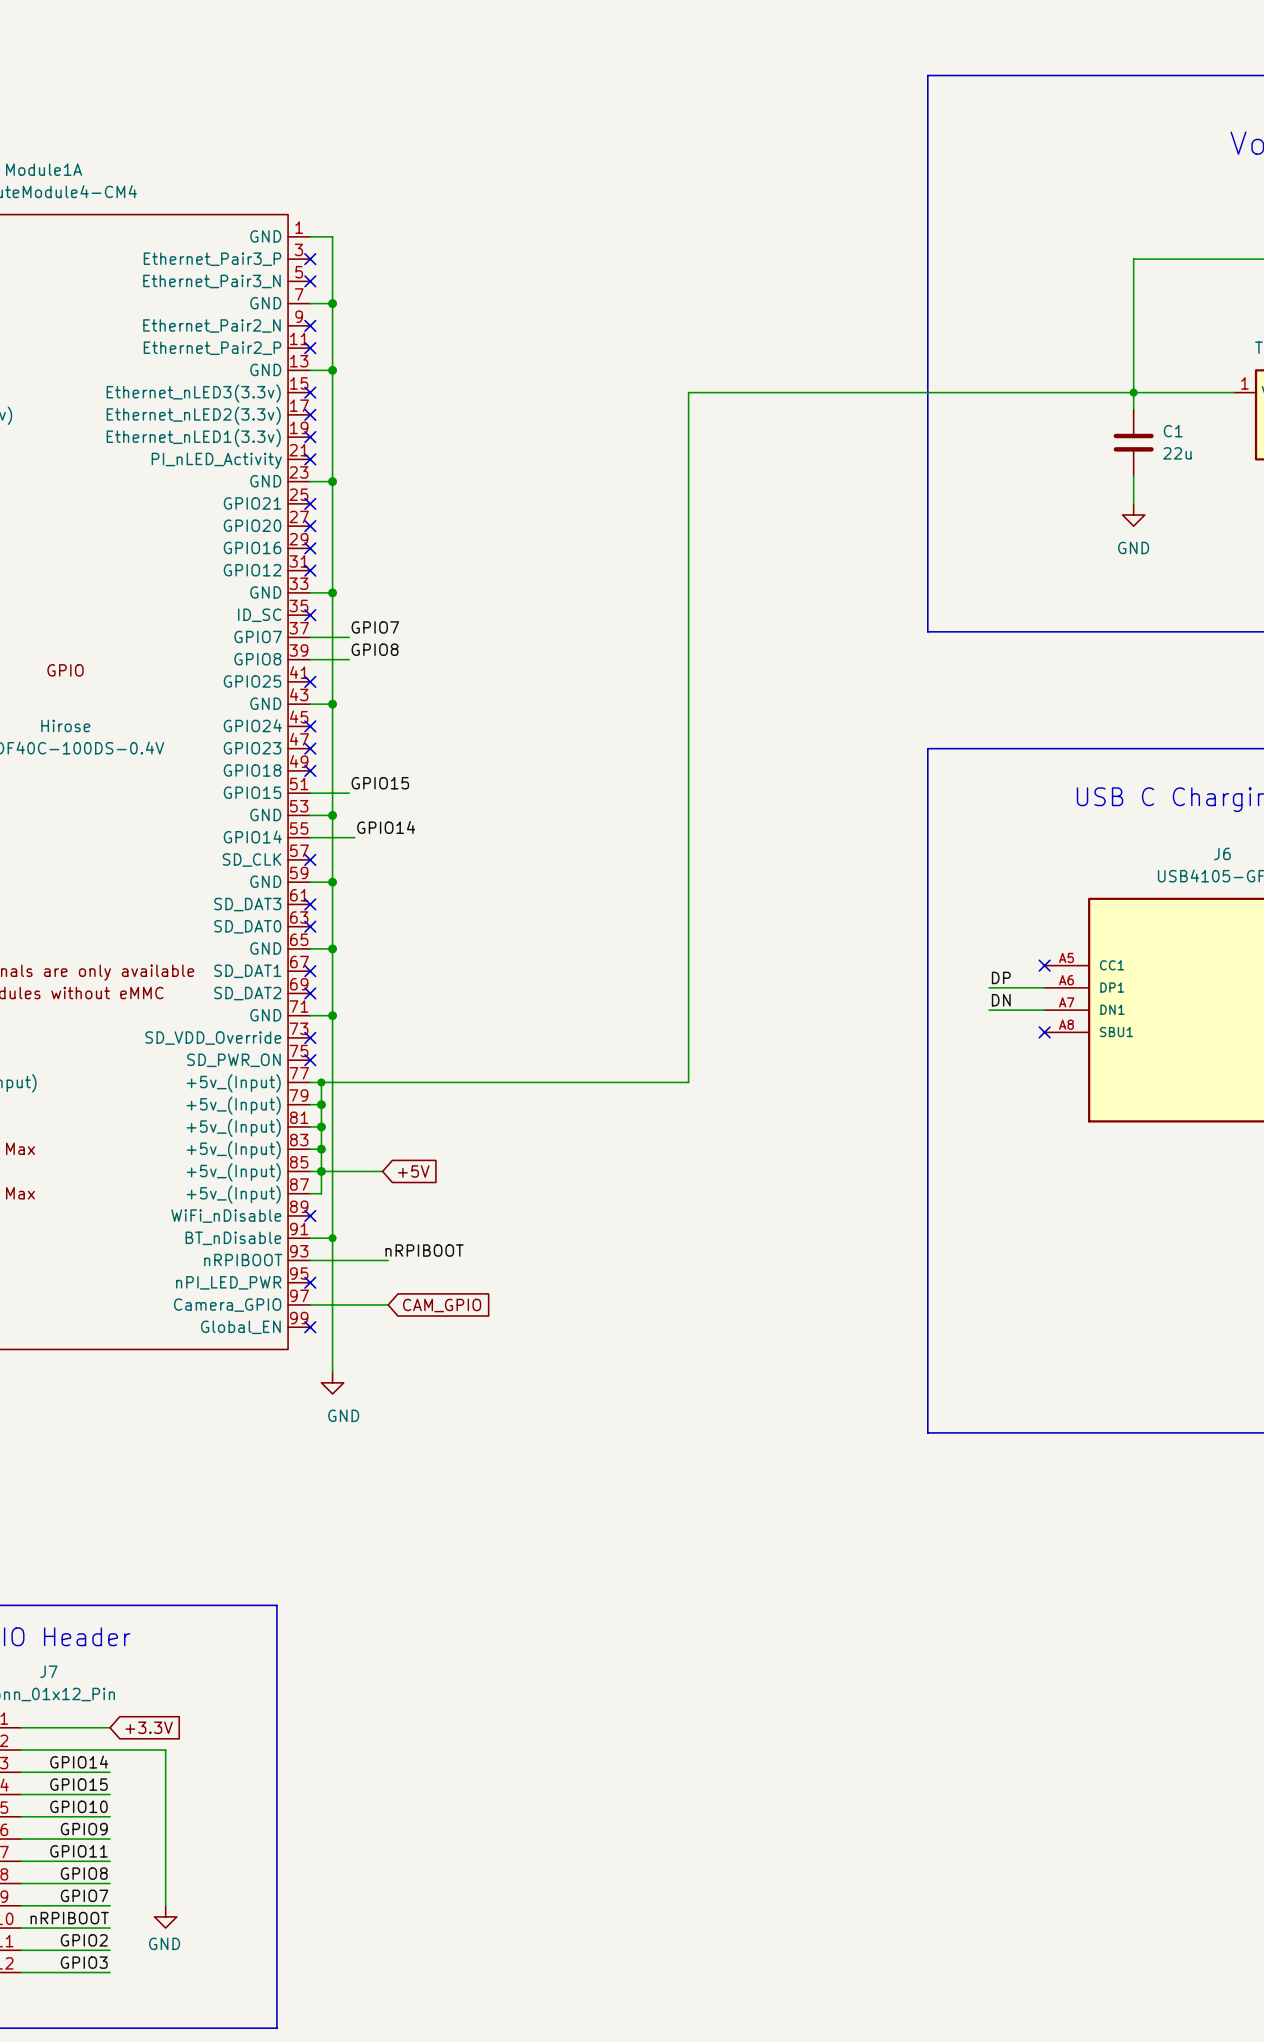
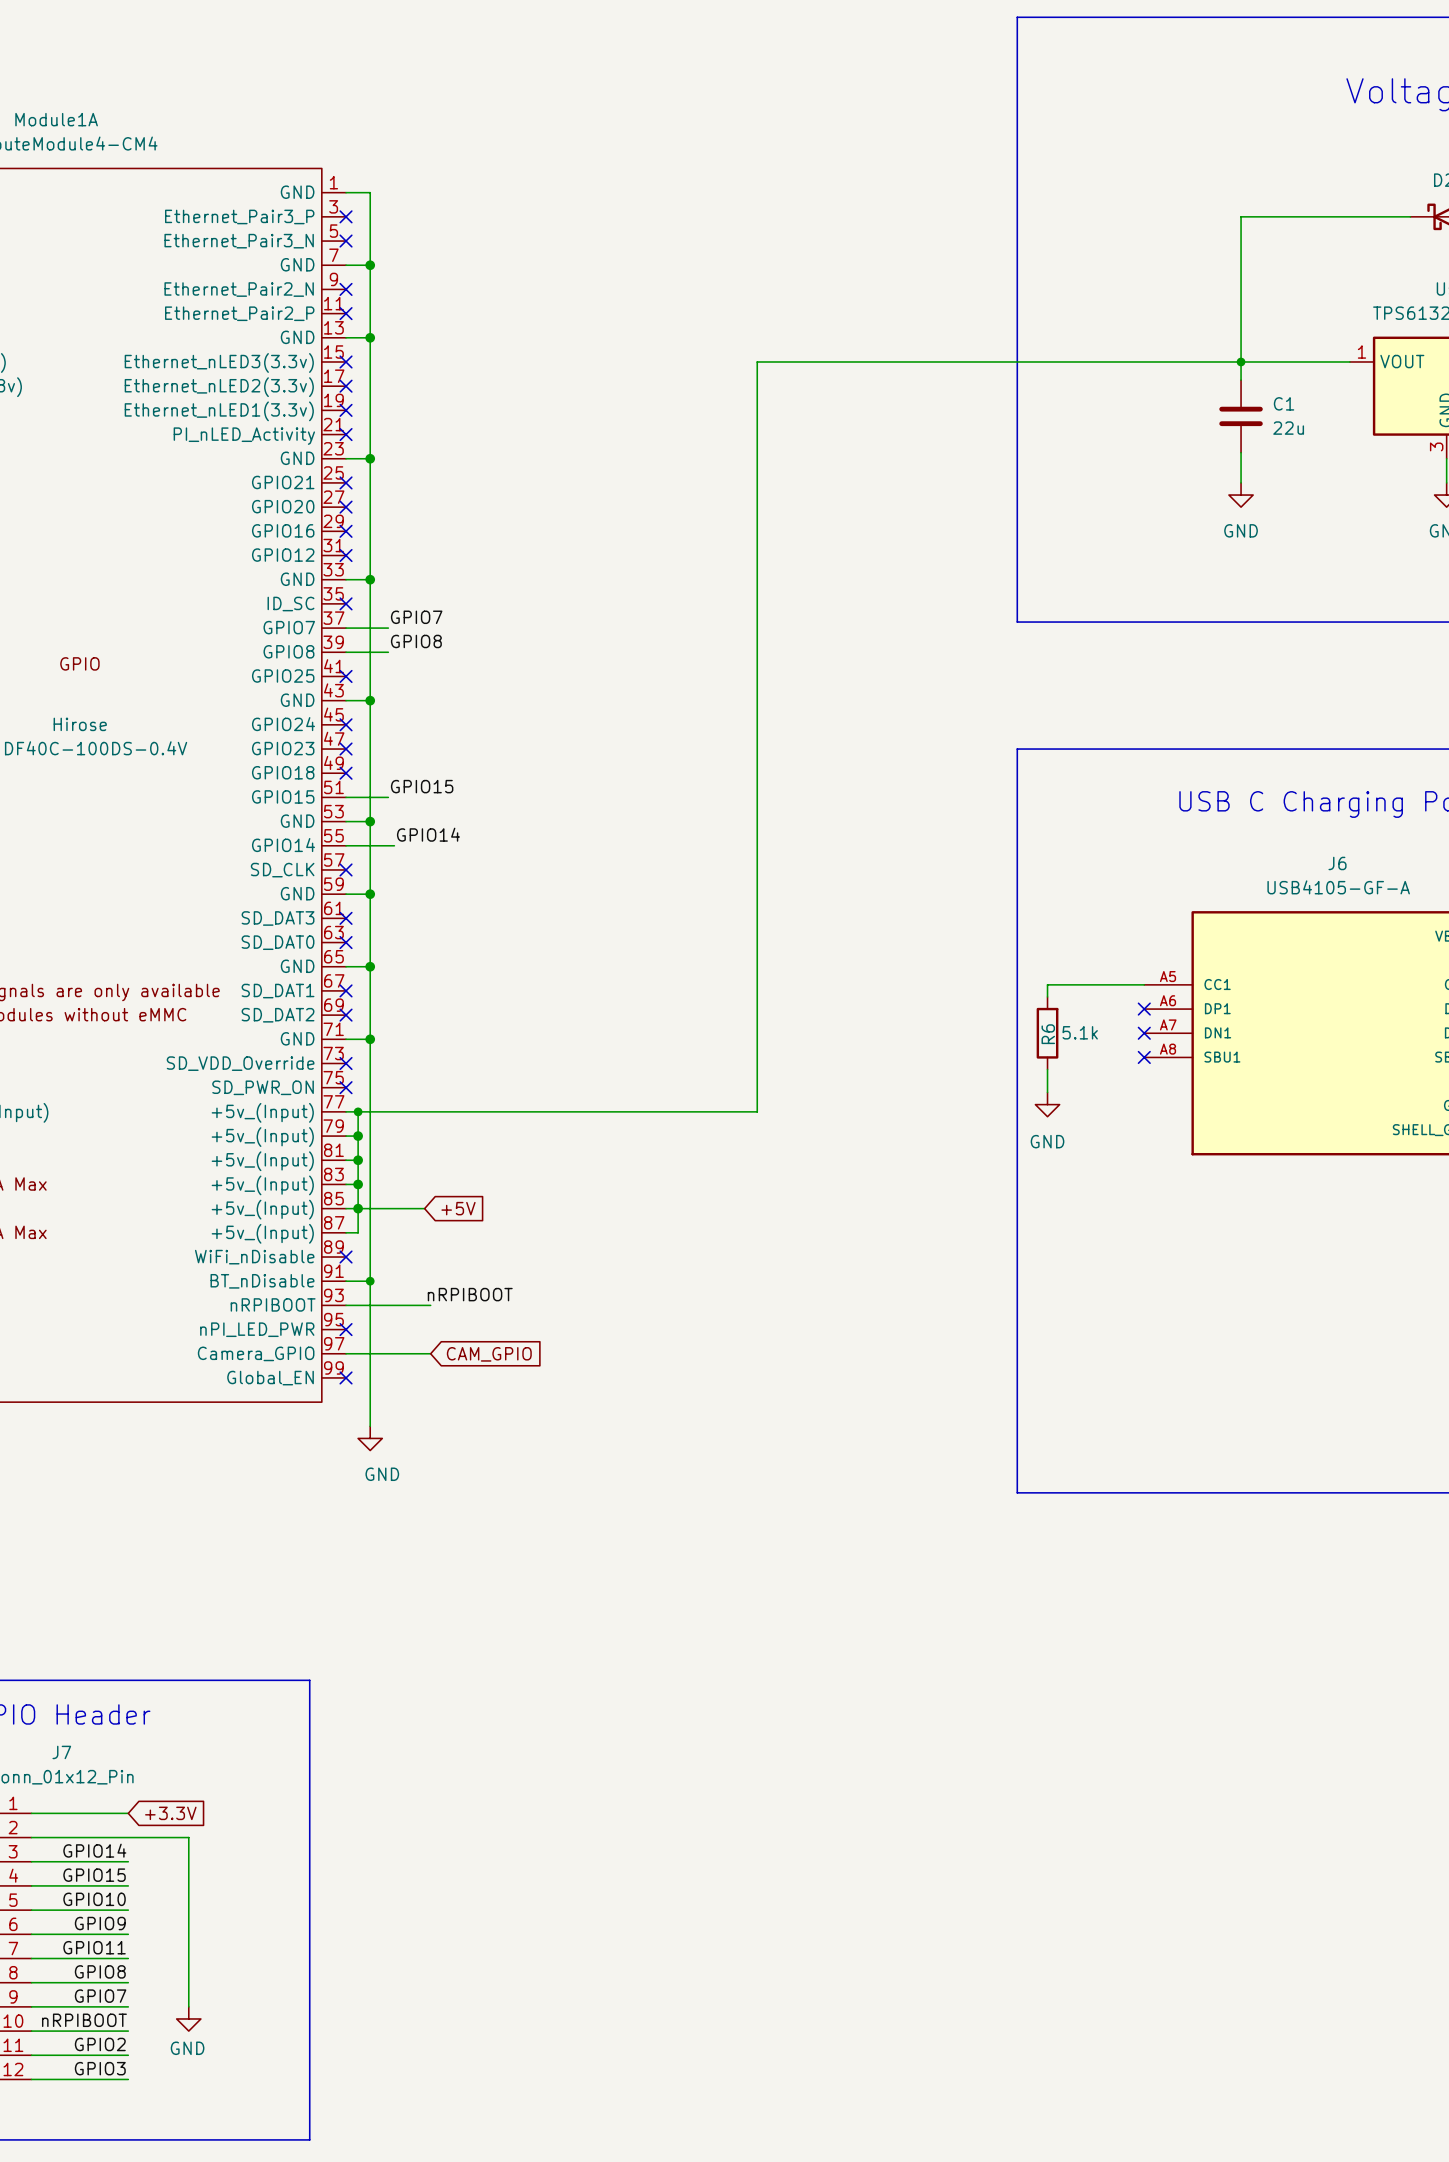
wire: none -> (1144, 984) (1047, 984) (1047, 996)
no-connect mark: (1044, 965) -> none
label: DP (1001, 977) -> none
wire: (989, 987) (1044, 987) -> none
no-connect mark: none -> (1144, 1009)
label: DN (1001, 1000) -> none
R6: none -> 5.1k (1047, 1033)
wire: (989, 1010) (1044, 1010) -> none
no-connect mark: none -> (1144, 1033)
wire: none -> (1047, 1069) (1047, 1092)
power symbol: none -> GND (1047, 1104)

